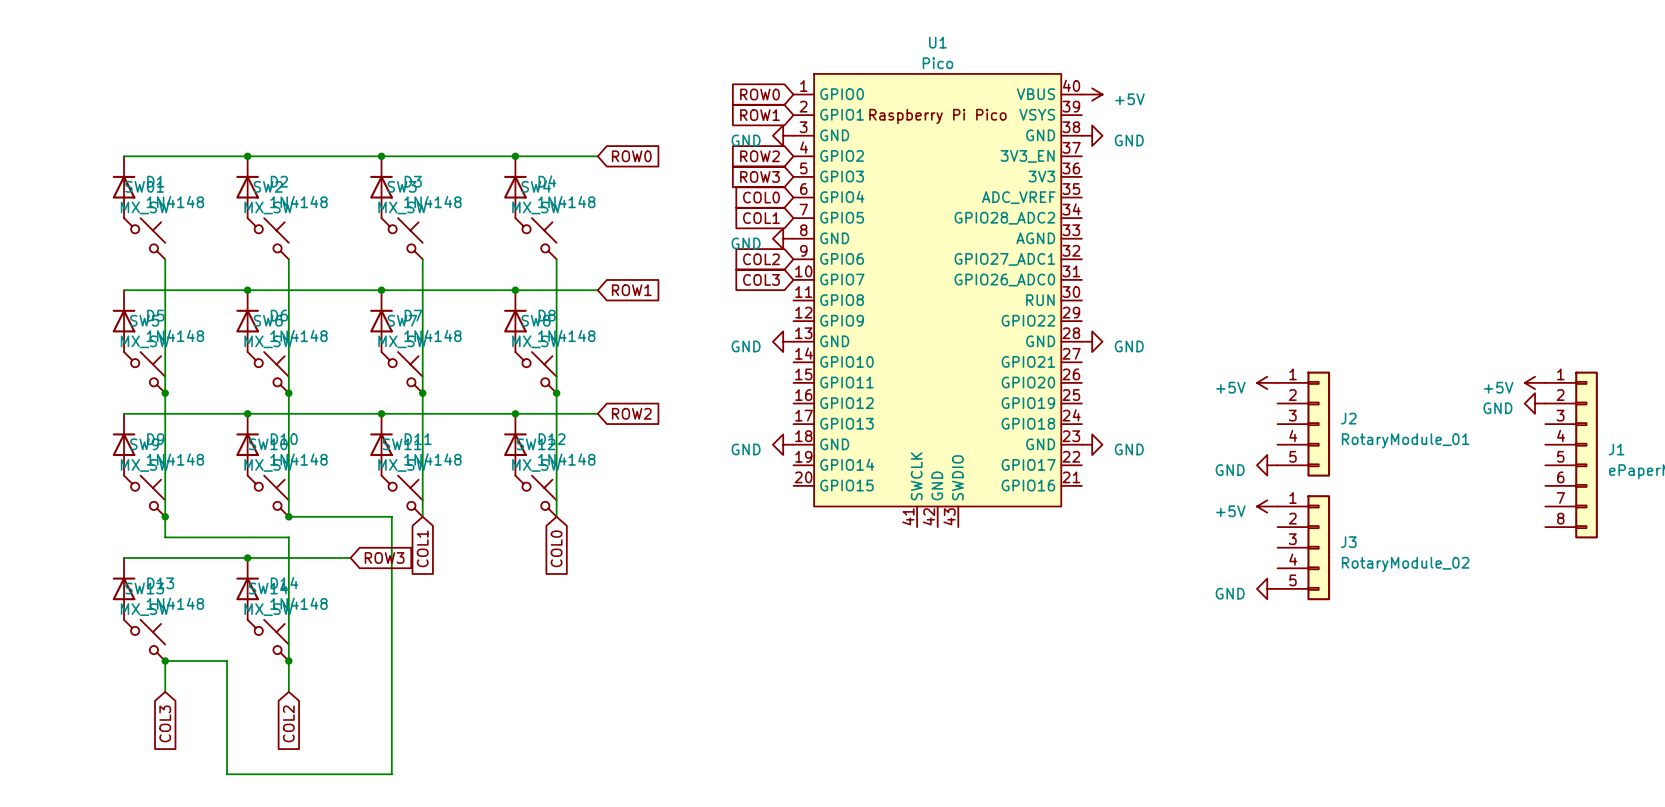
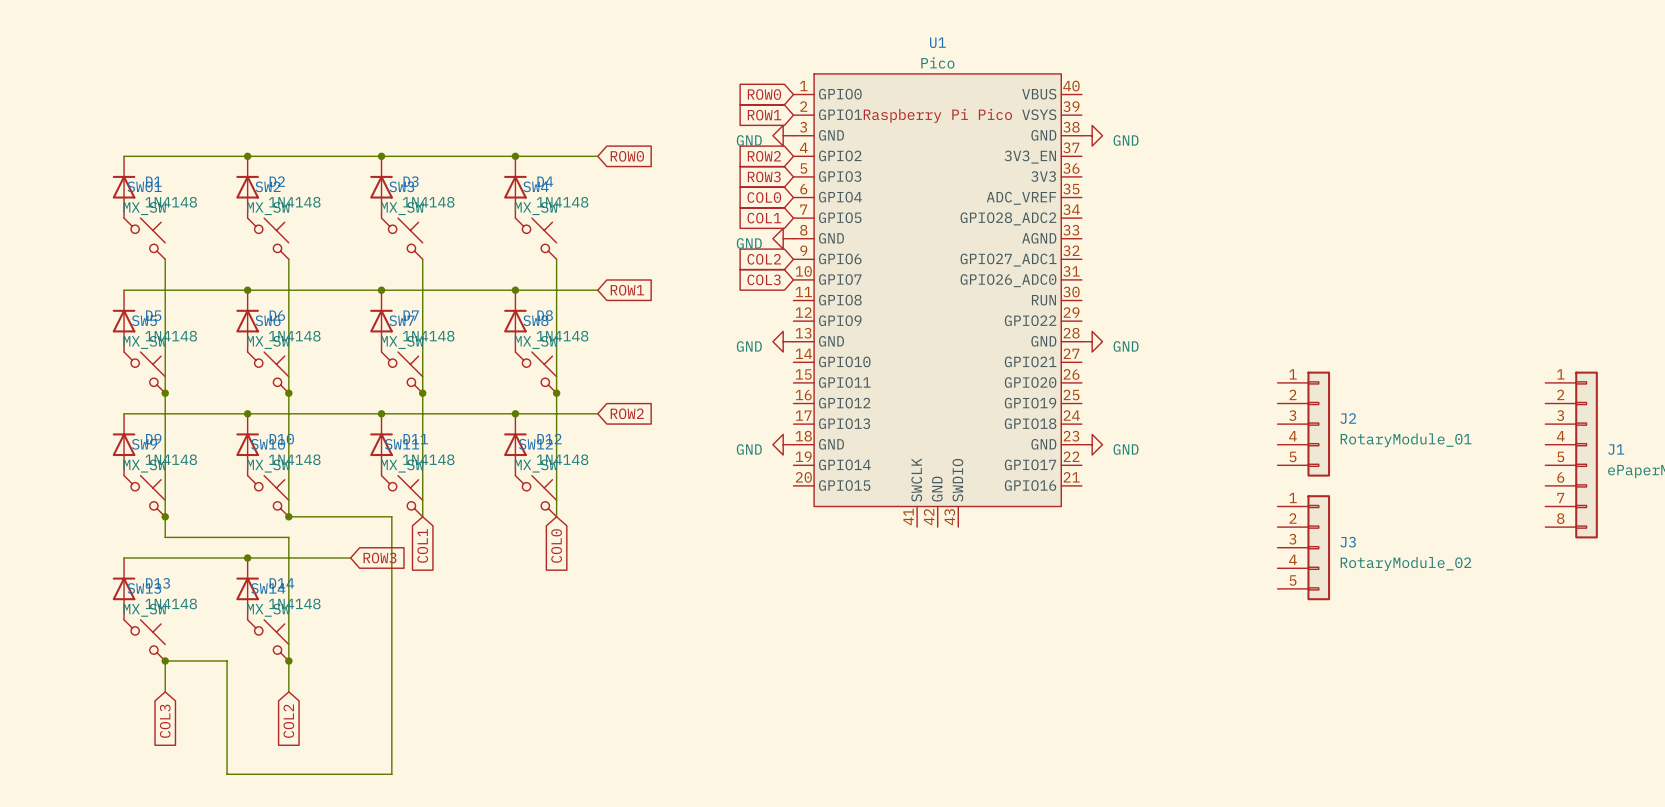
power symbol: +5V (1092, 94) -> none
power symbol: +5V (1267, 382) -> none
power symbol: +5V (1535, 382) -> none
power symbol: GND (1535, 403) -> none
power symbol: GND (1267, 465) -> none
power symbol: +5V (1267, 506) -> none
power symbol: GND (1267, 588) -> none

